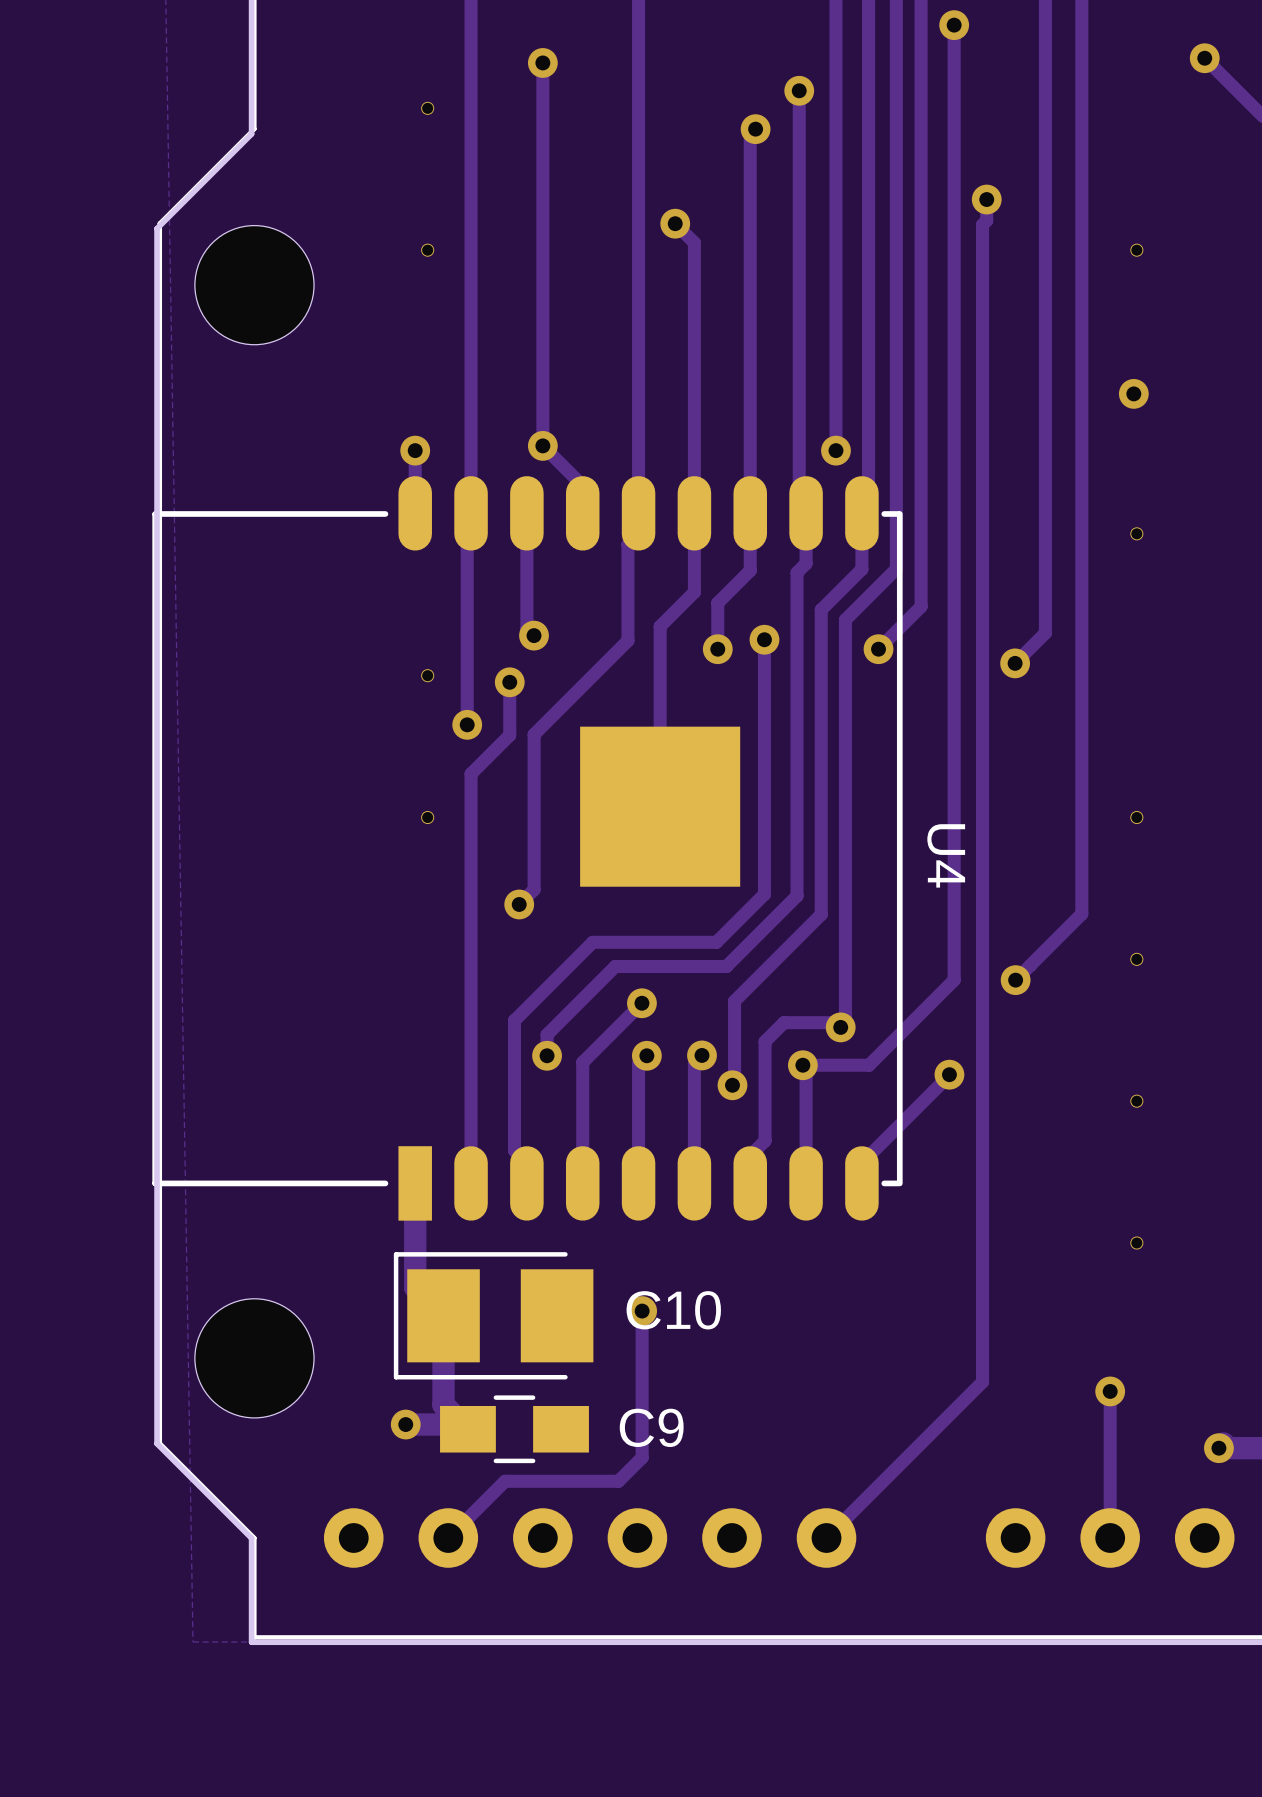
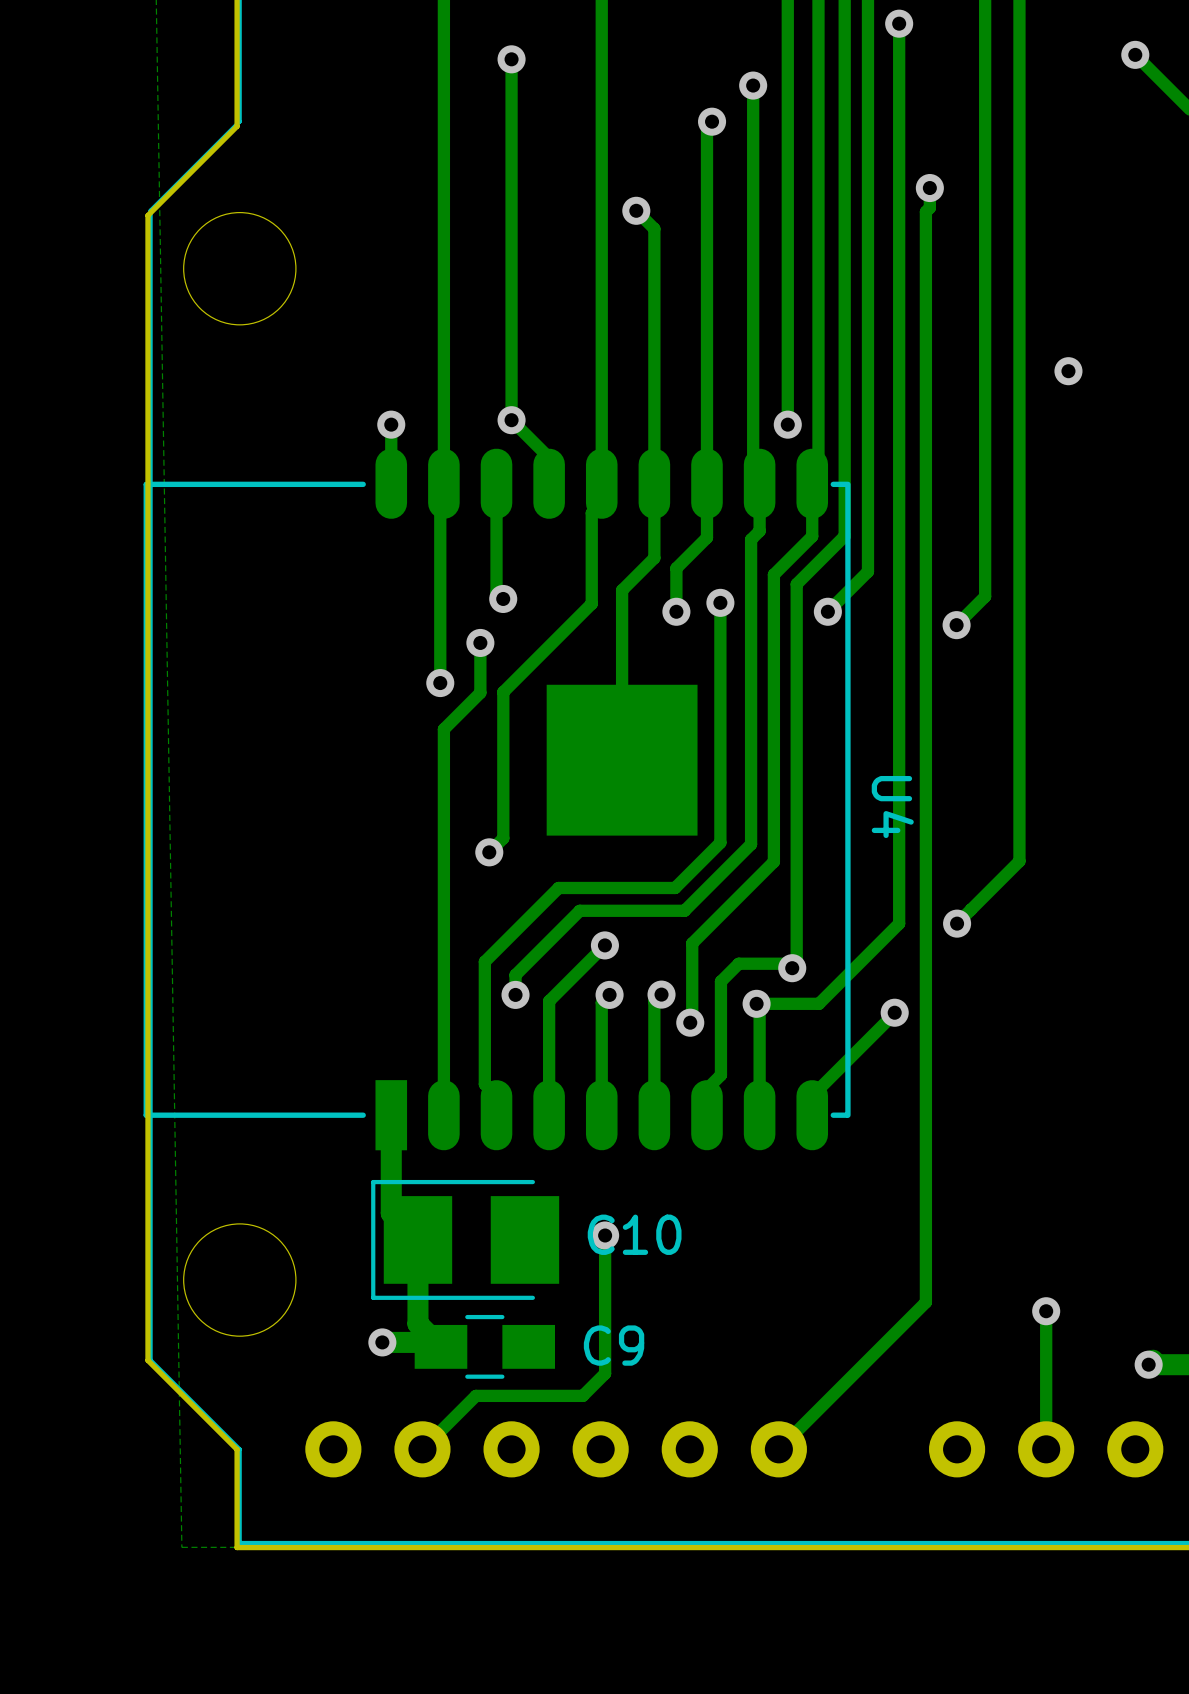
part: (427, 108) -> none
part: (427, 250) -> none
part: (1136, 250) -> none
part: (1136, 533) -> none
part: (427, 675) -> none
part: (427, 817) -> none
part: (1136, 817) -> none
part: (1136, 959) -> none
part: (1136, 1101) -> none
part: (1136, 1243) -> none

